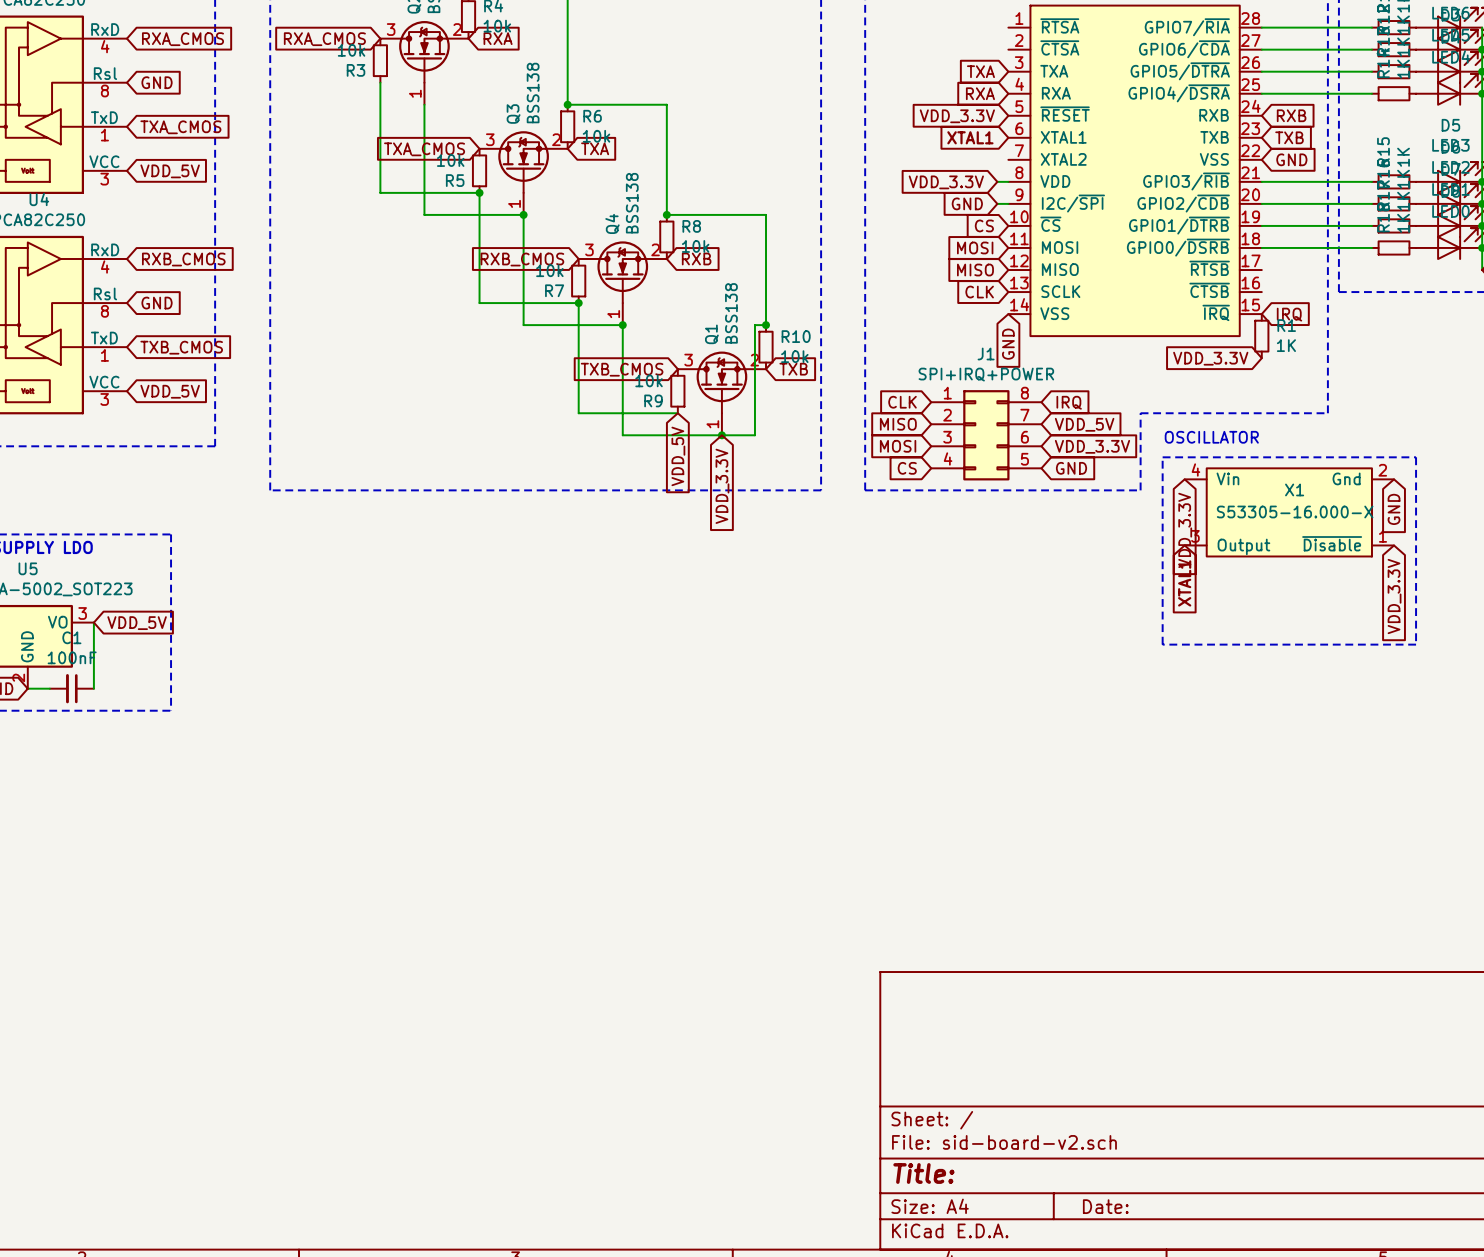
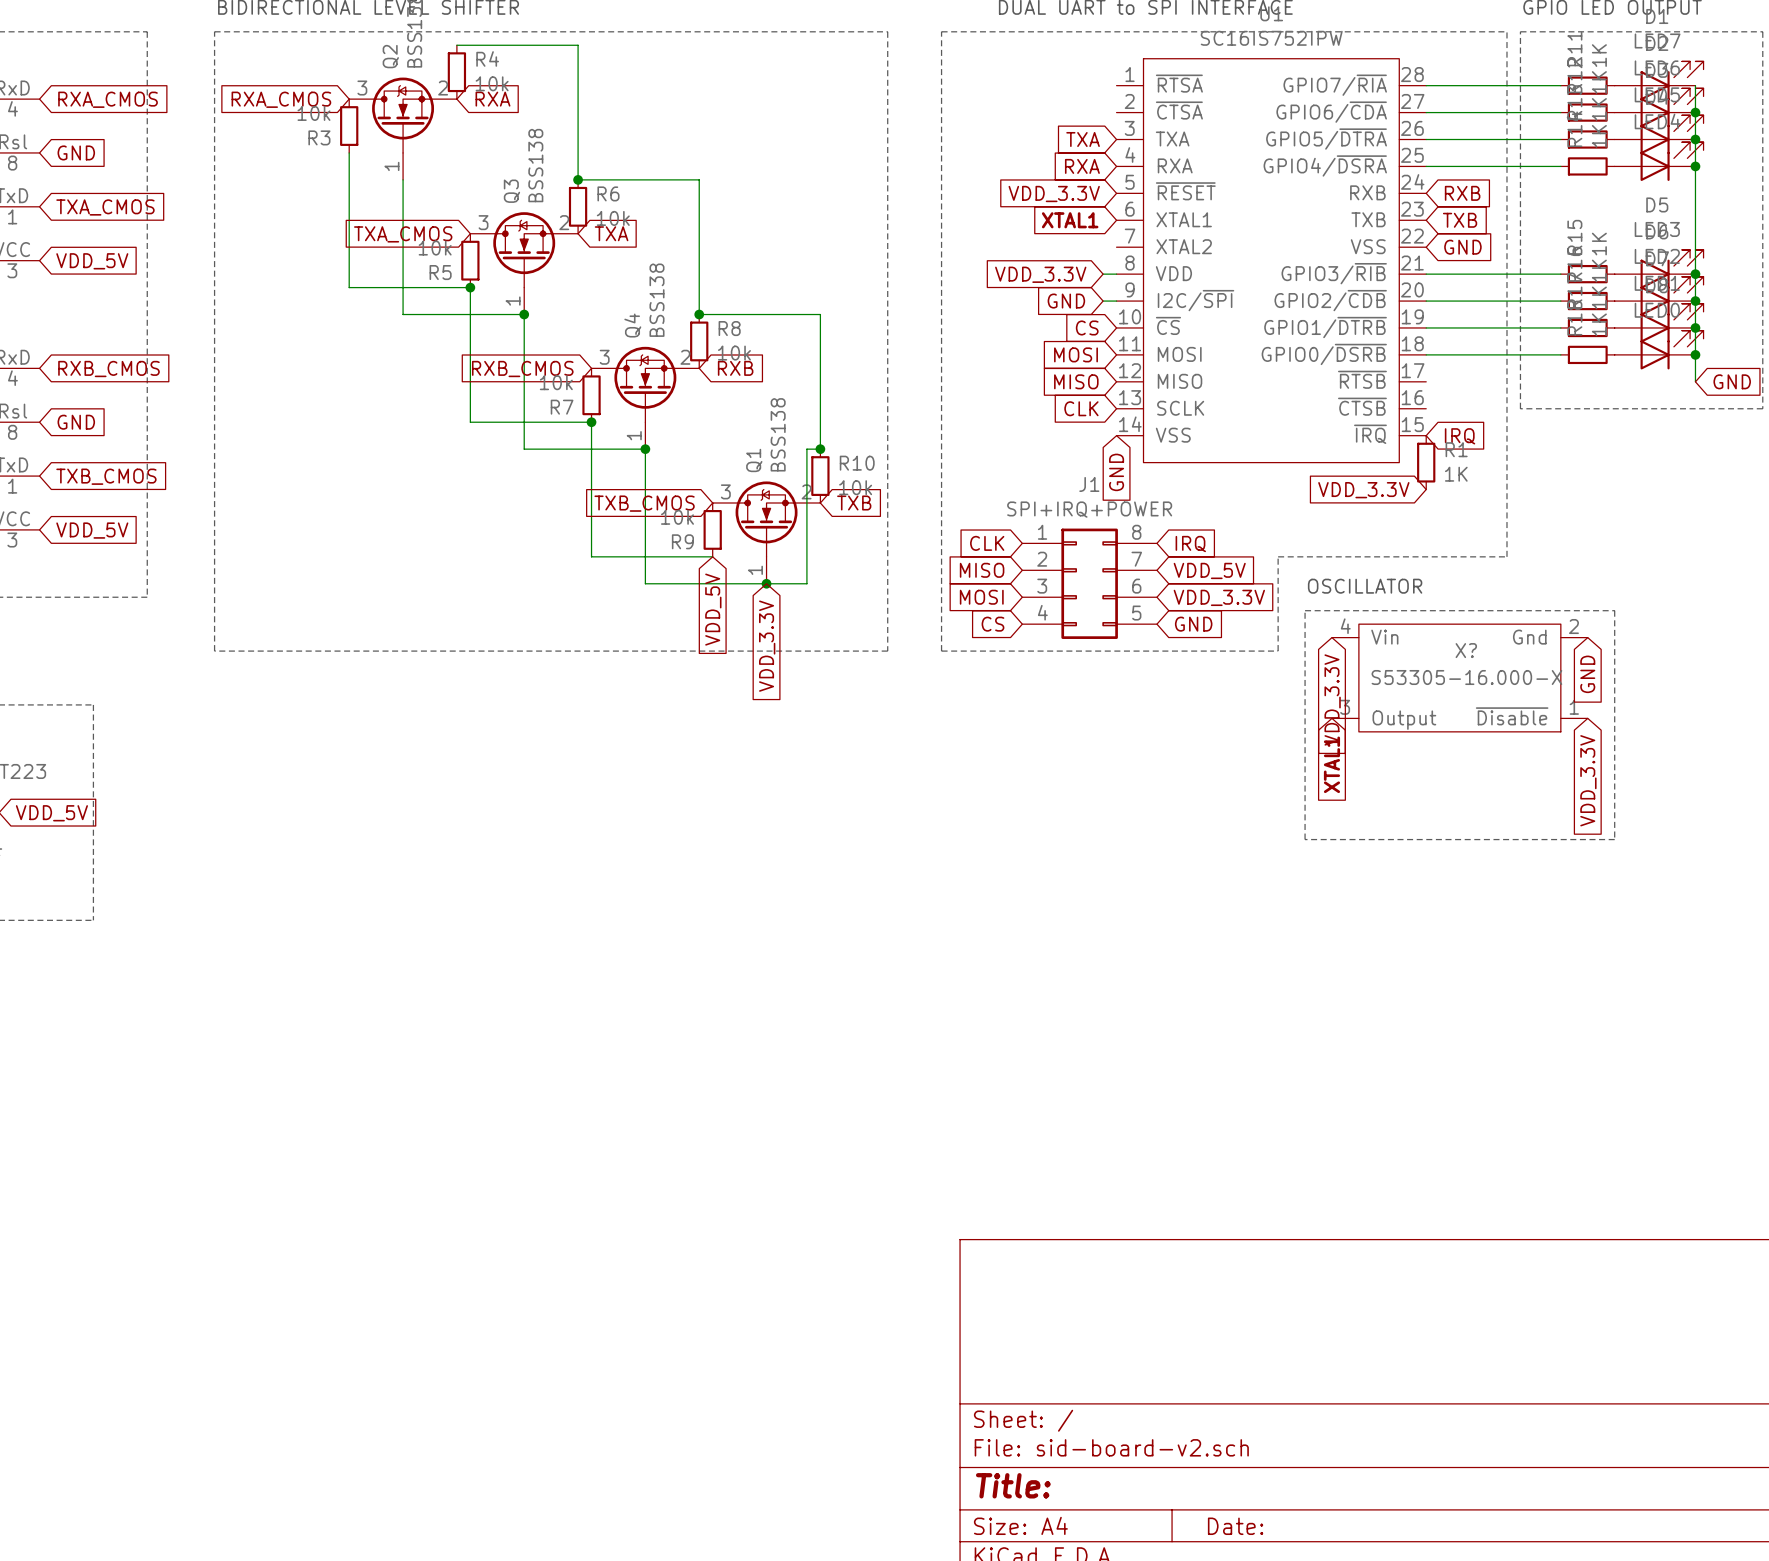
X1 name: X1 (1294, 489) -> X? (1466, 650)

